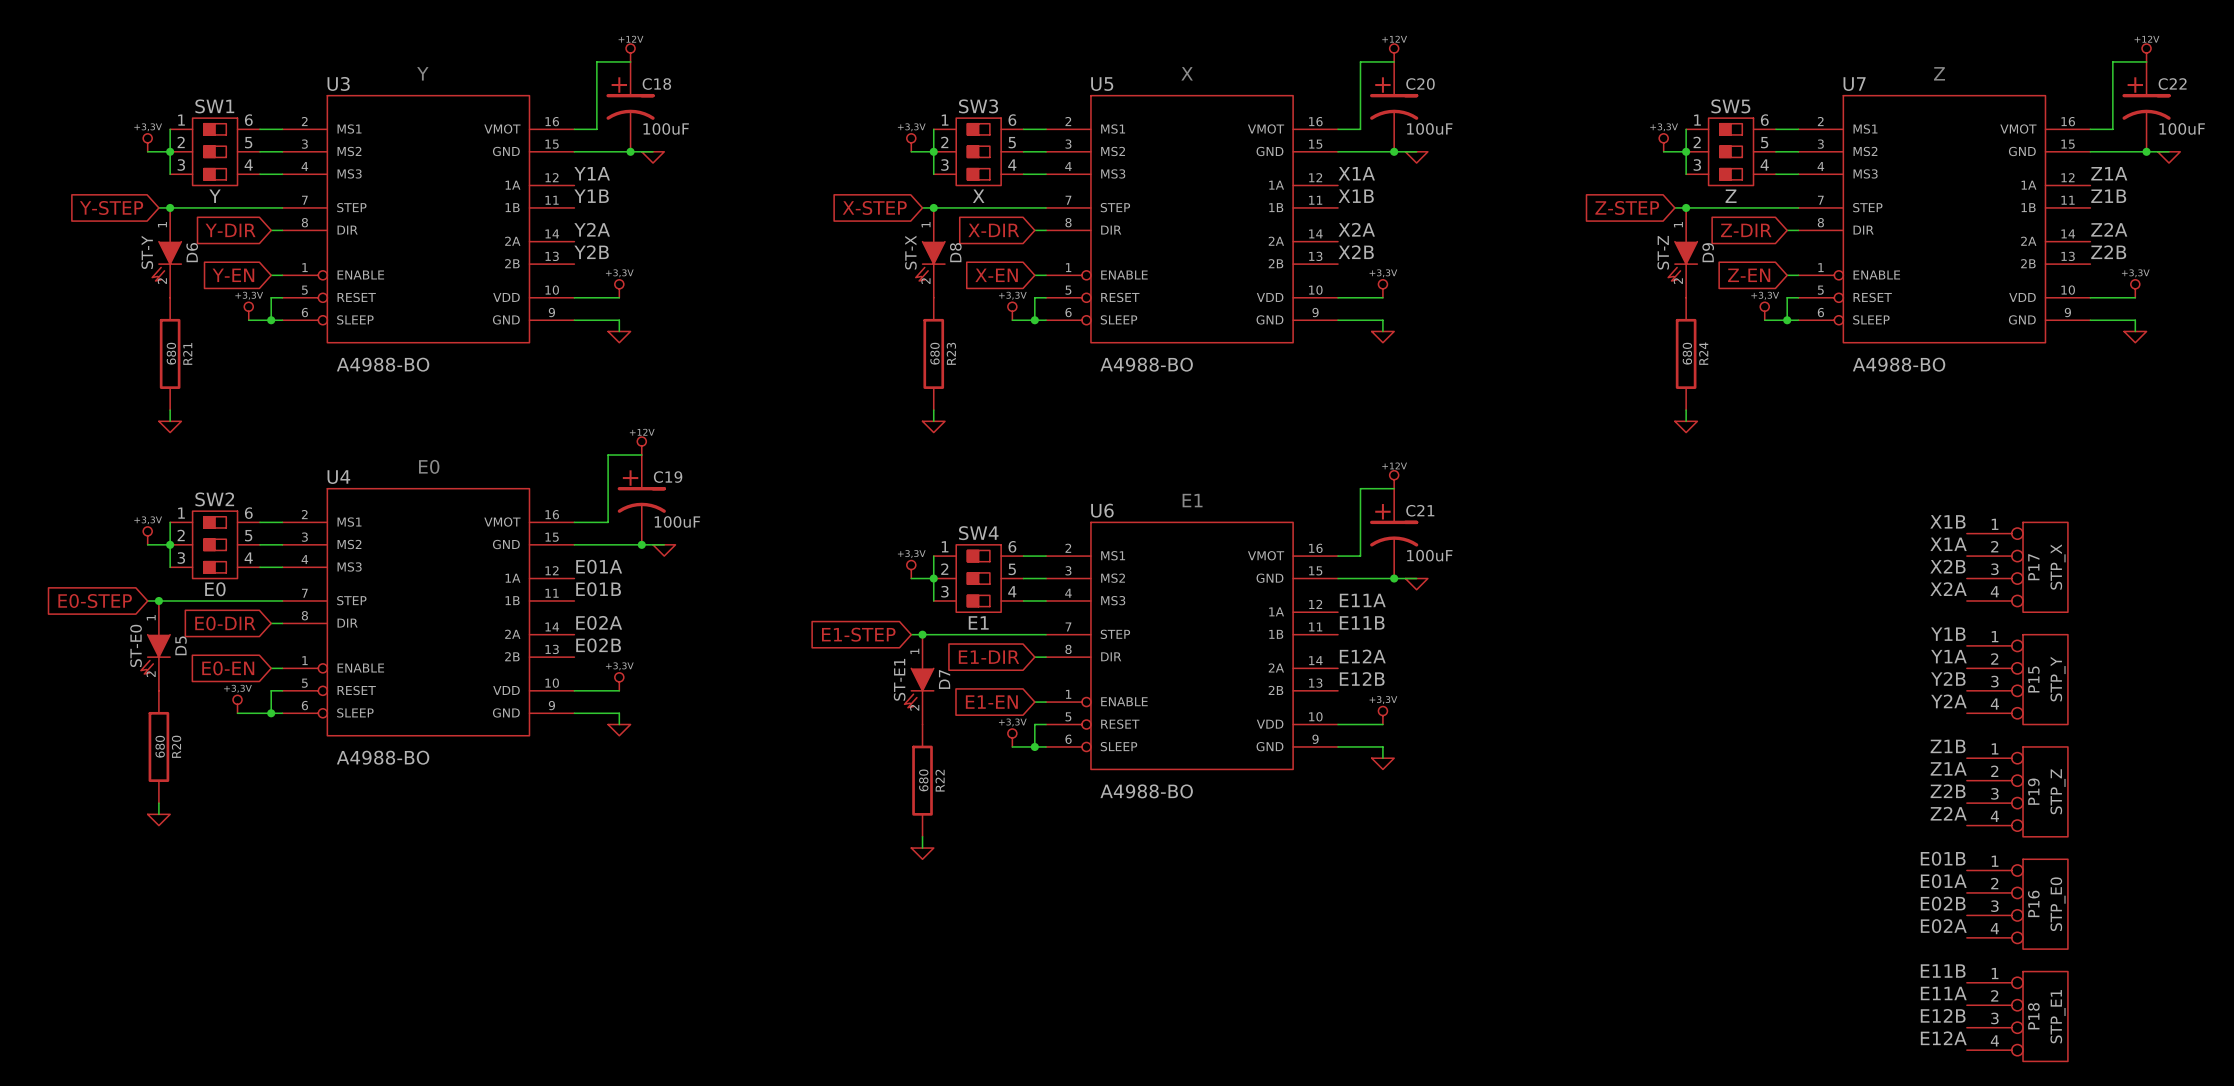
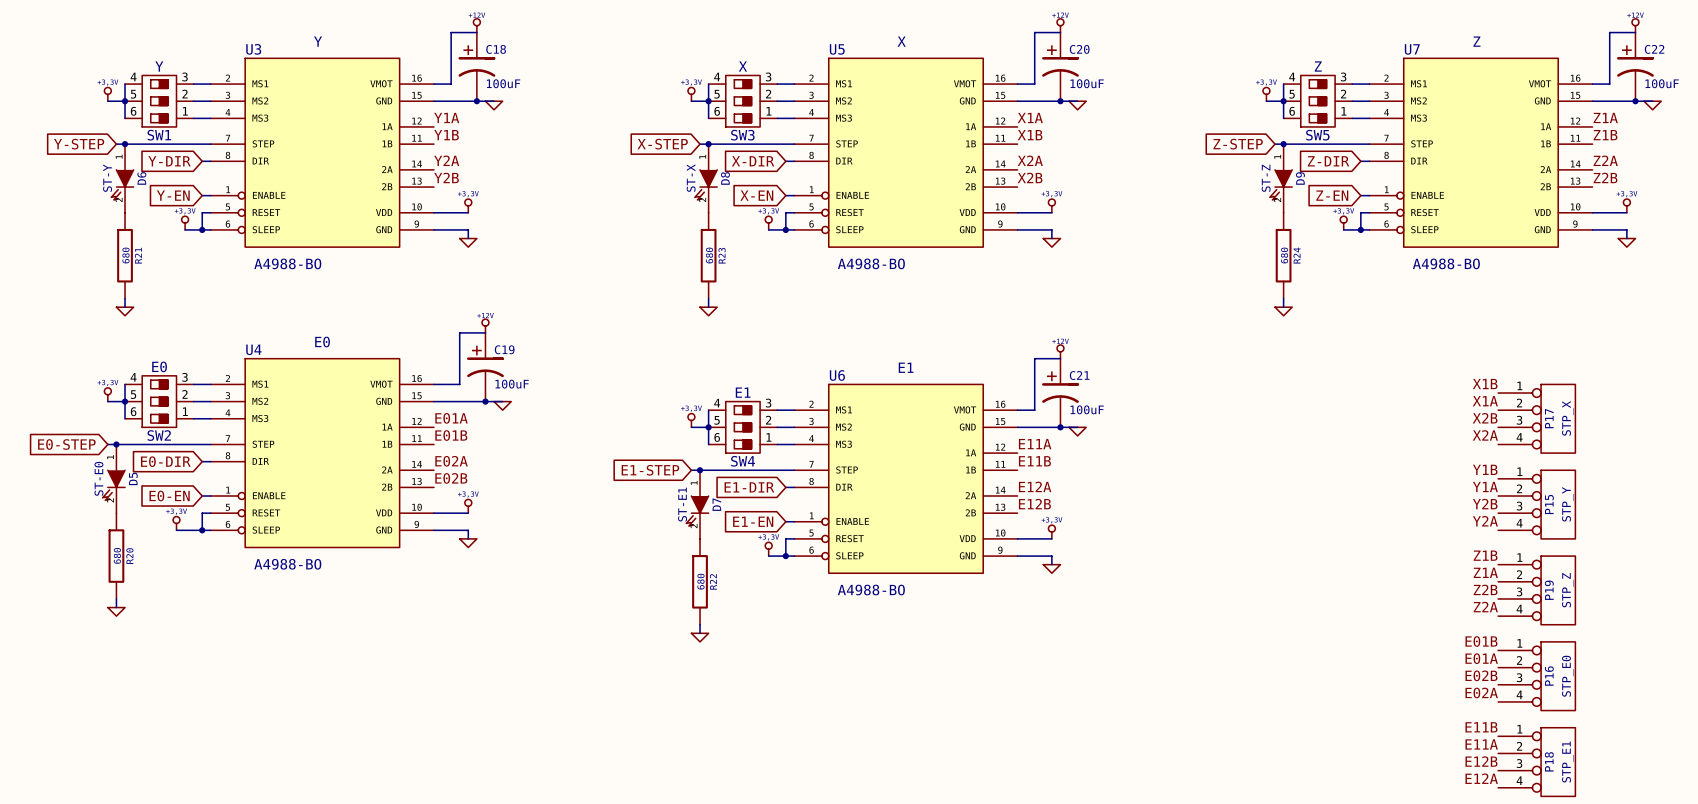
SW1 rotation: 0° (215, 151) -> 180° (159, 101)
SW3 rotation: 0° (978, 151) -> 180° (742, 101)
SW5 rotation: 0° (1731, 151) -> 180° (1317, 101)
SW2 rotation: 0° (215, 544) -> 180° (159, 401)
SW4 rotation: 0° (978, 578) -> 180° (742, 427)

